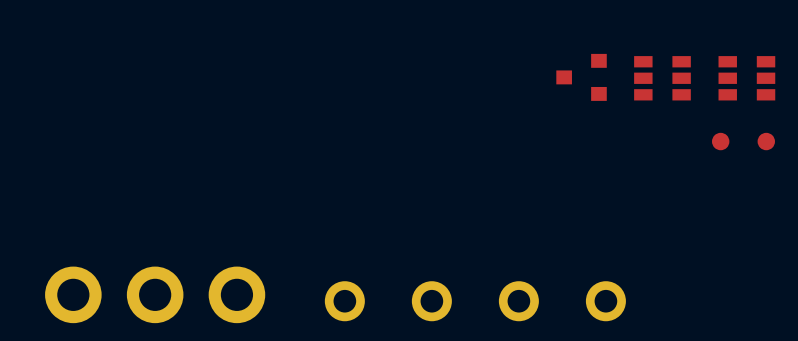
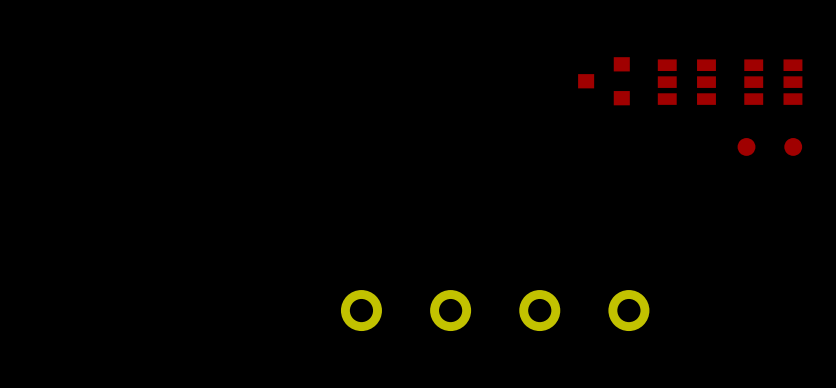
part: (155, 294) -> none

